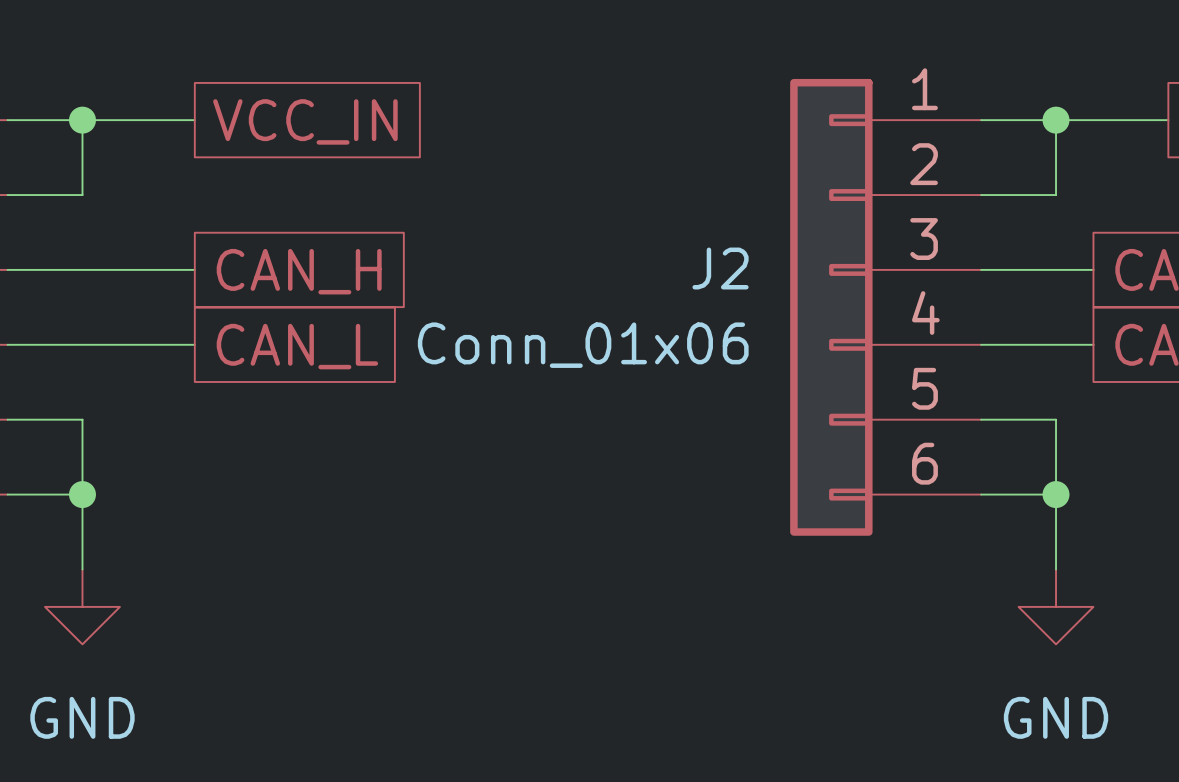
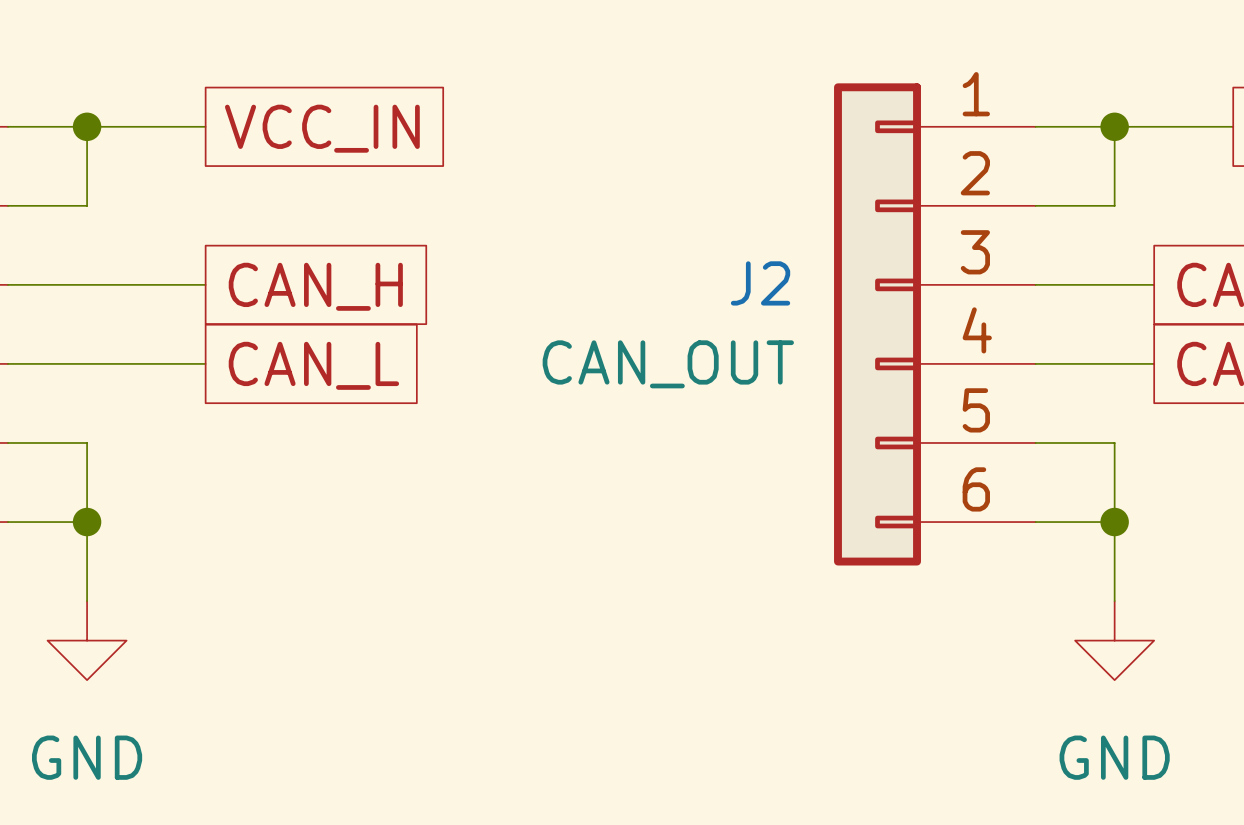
J2 value: Conn_01x06 (583, 345) -> CAN_OUT (668, 364)

